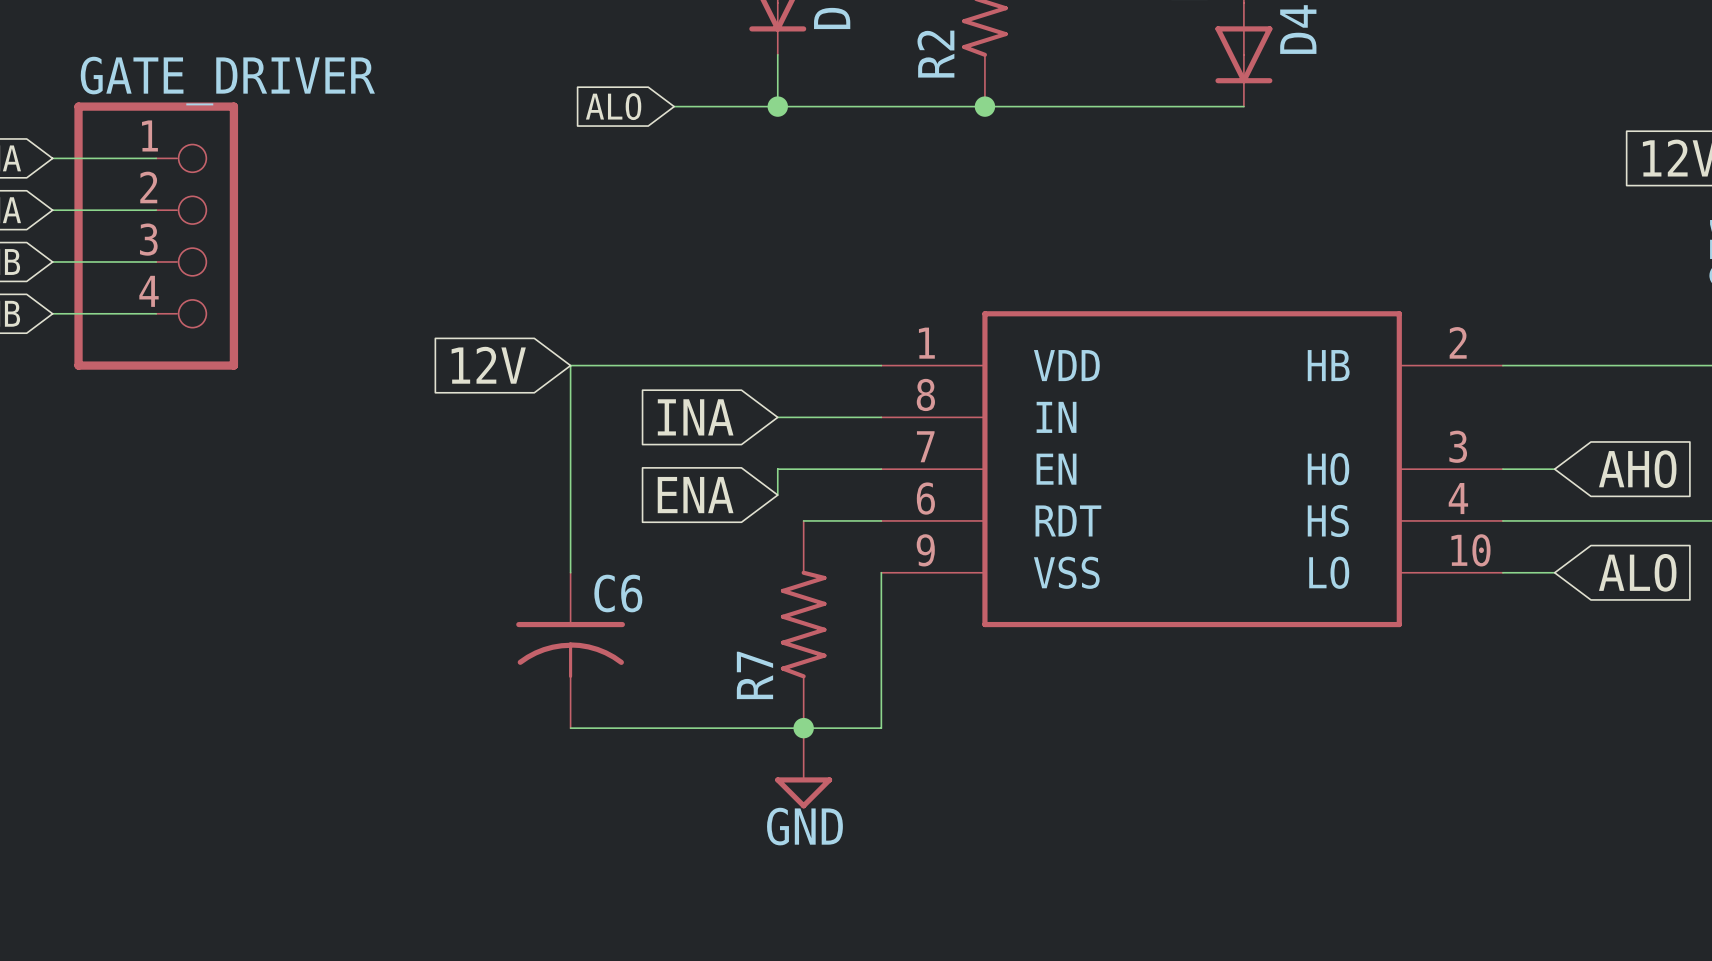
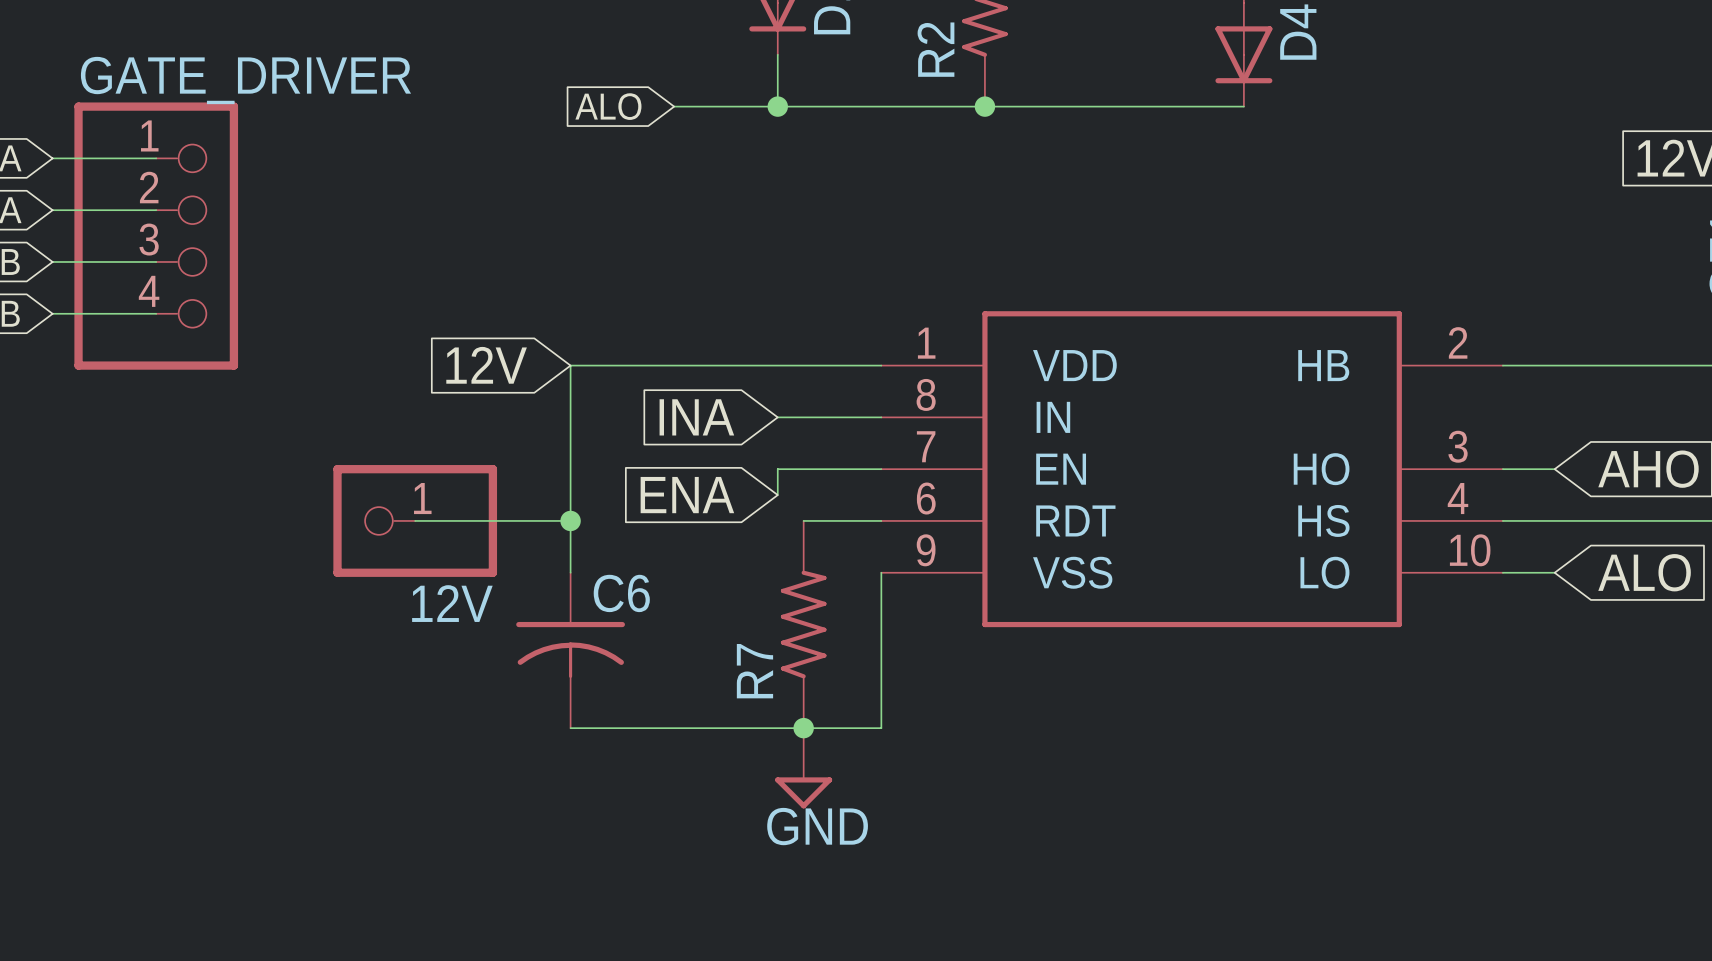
wire: none -> (415, 520) (570, 520)
12V: none -> (415, 520)
junction: none -> (570, 520)

